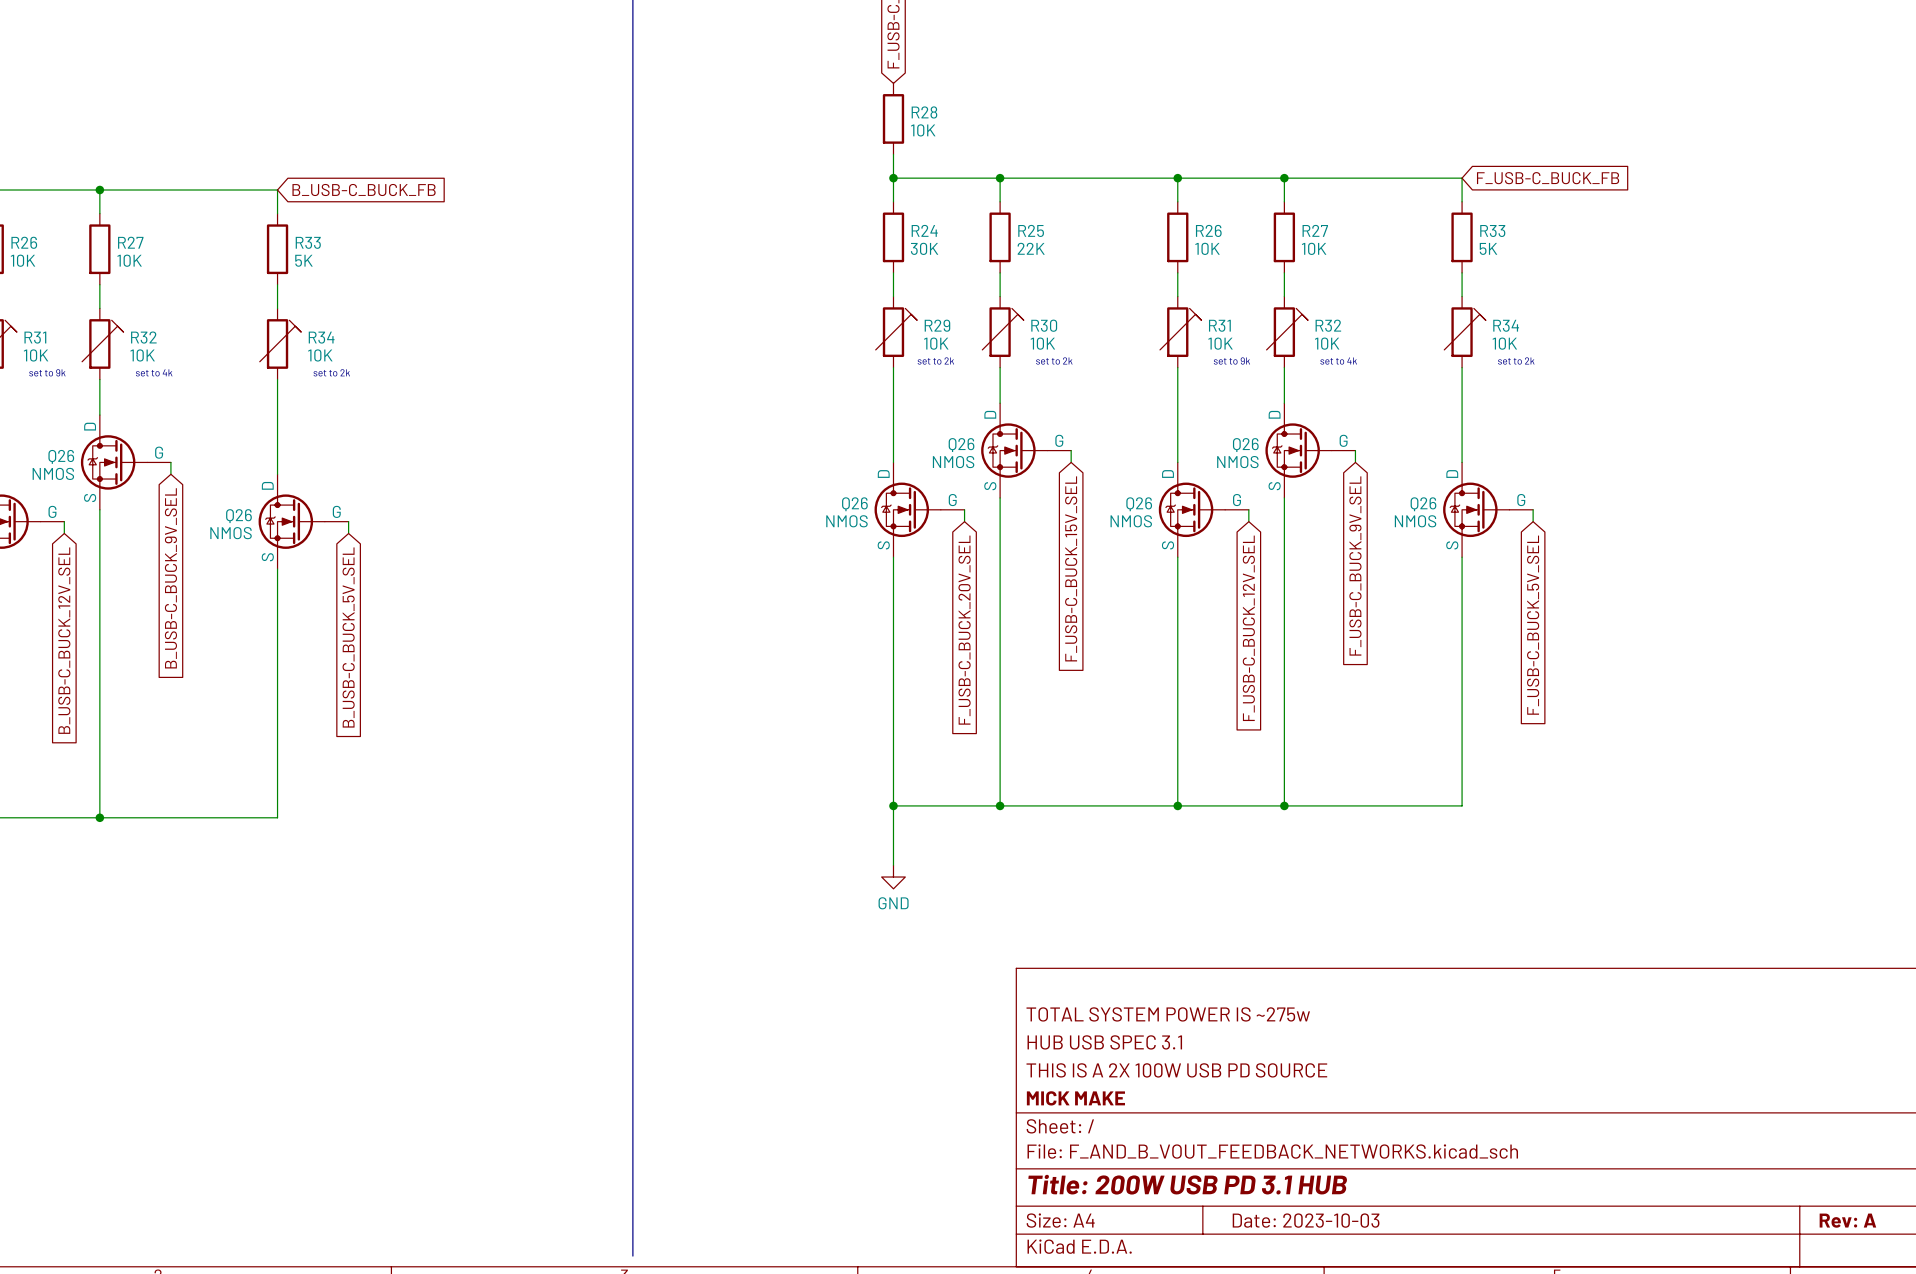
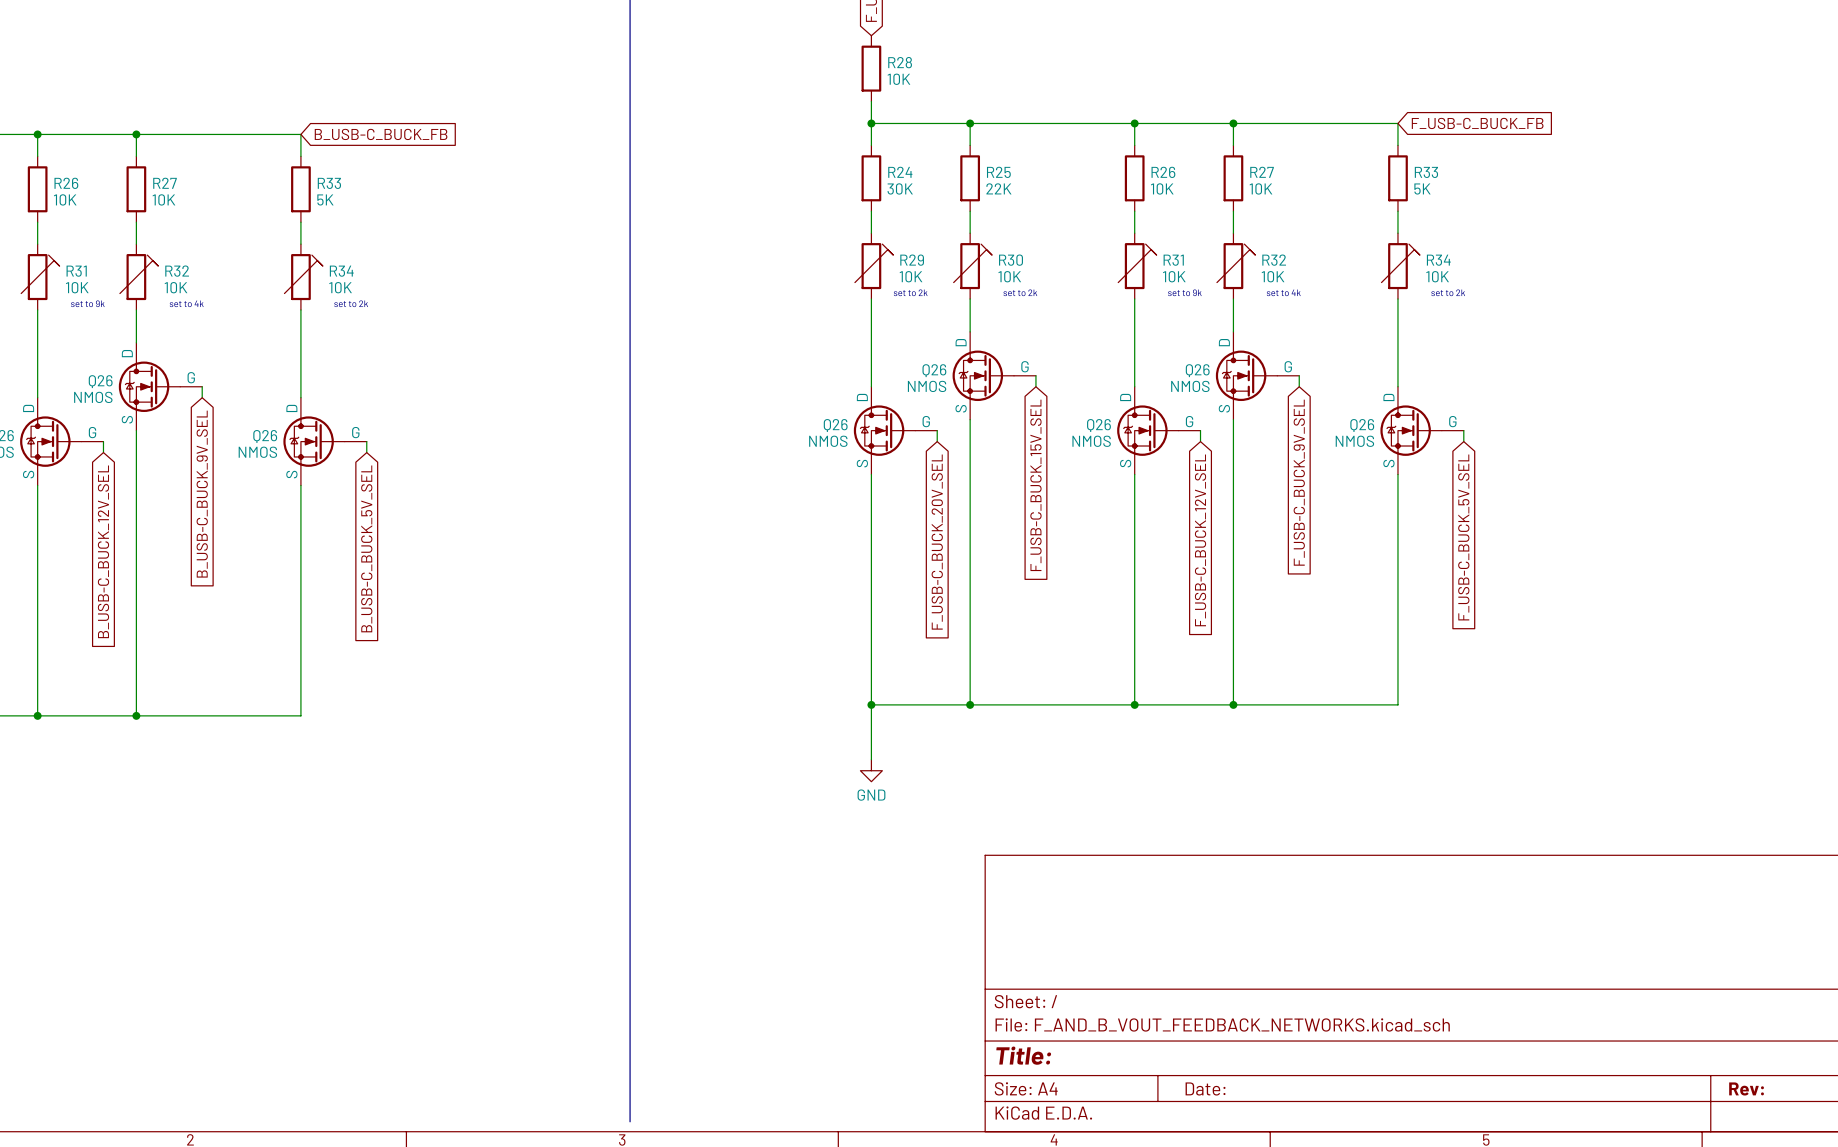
title block: TOTAL SYSTEM POWER IS ~275w (1168, 1014) -> none
title block: HUB USB SPEC 3.1 (1104, 1042) -> none
title block: THIS IS A 2X 100W USB PD SOURCE (1176, 1070) -> none
title block: MICK MAKE (1075, 1098) -> none
title block: Title: 200W USB PD 3.1 HUB (1187, 1184) -> Title: (1023, 1055)
title block: Date: 2023-10-03 (1306, 1220) -> Date: (1205, 1088)
title block: Rev: A (1847, 1220) -> Rev: (1746, 1088)

